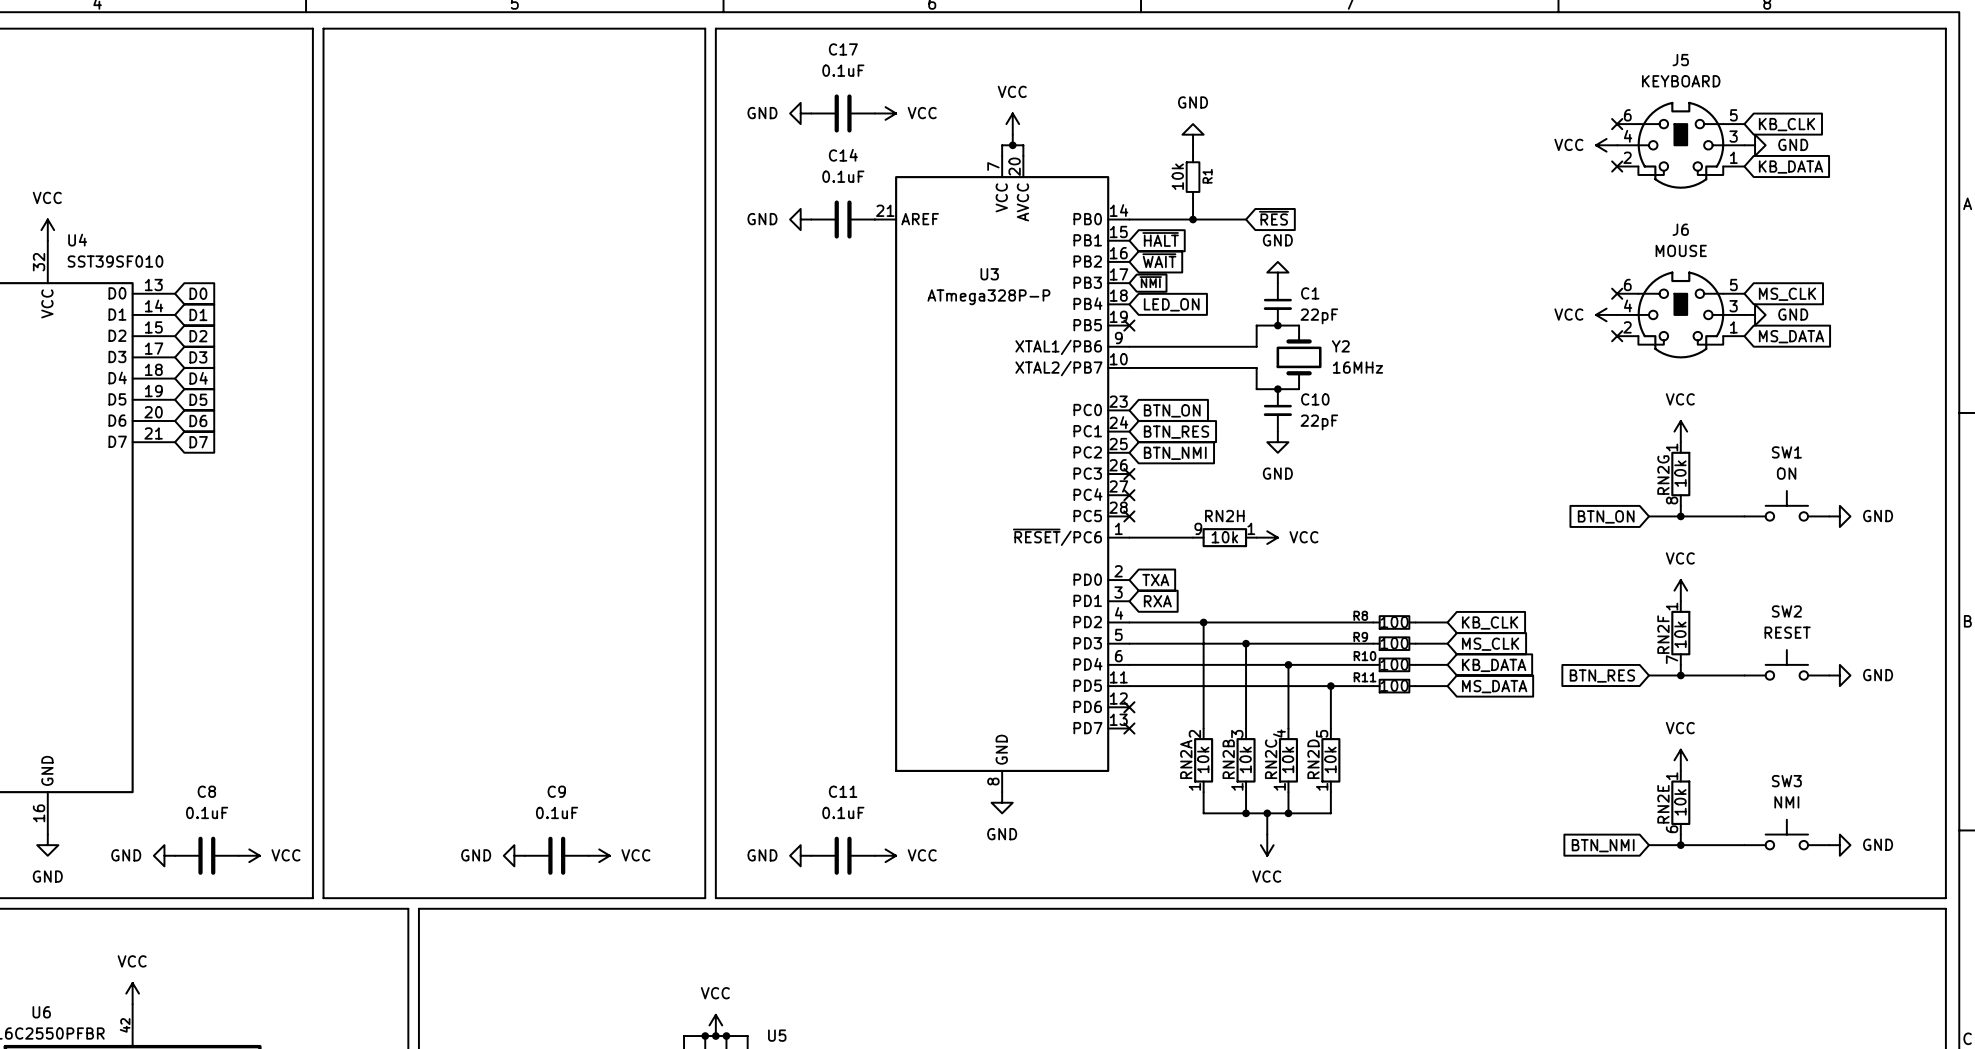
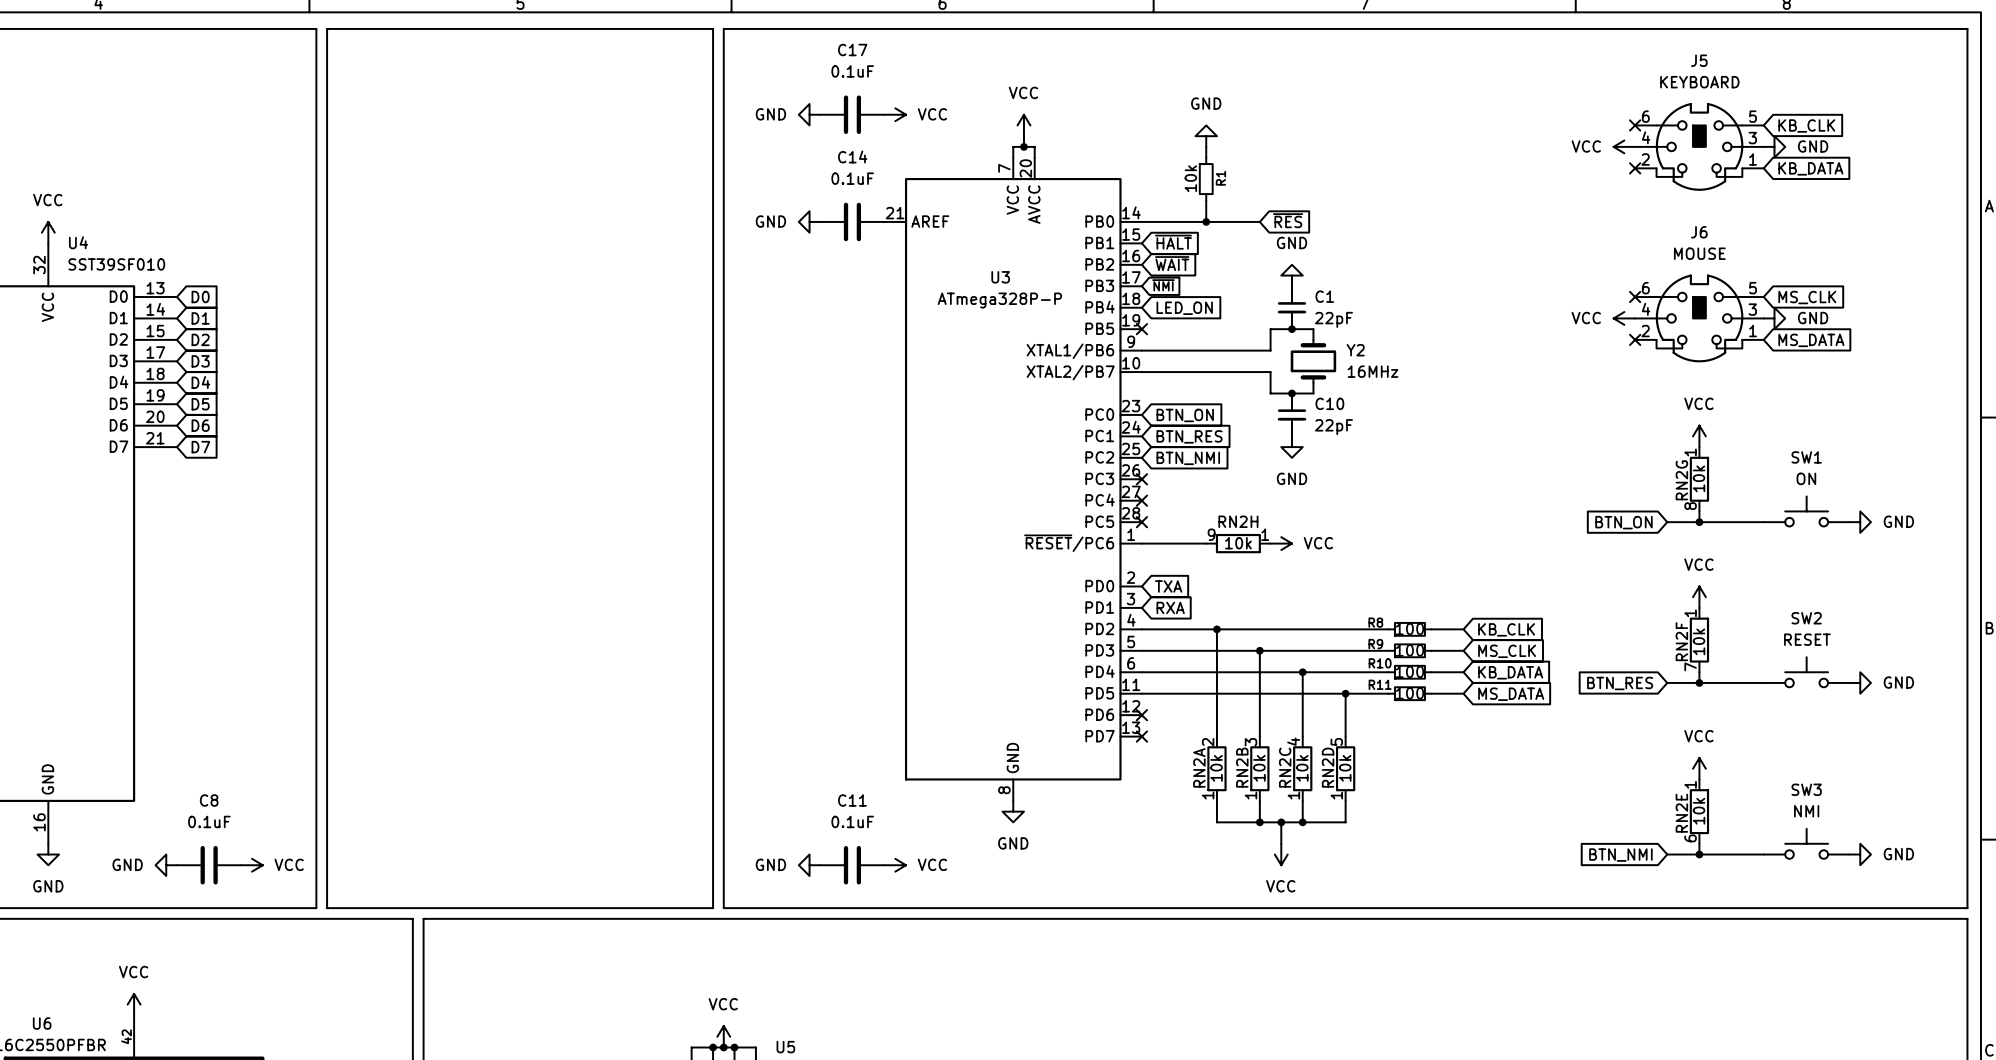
power symbol: GND (514, 855) -> none
C9: 0.1uF (556, 855) -> none
power symbol: VCC (599, 855) -> none

